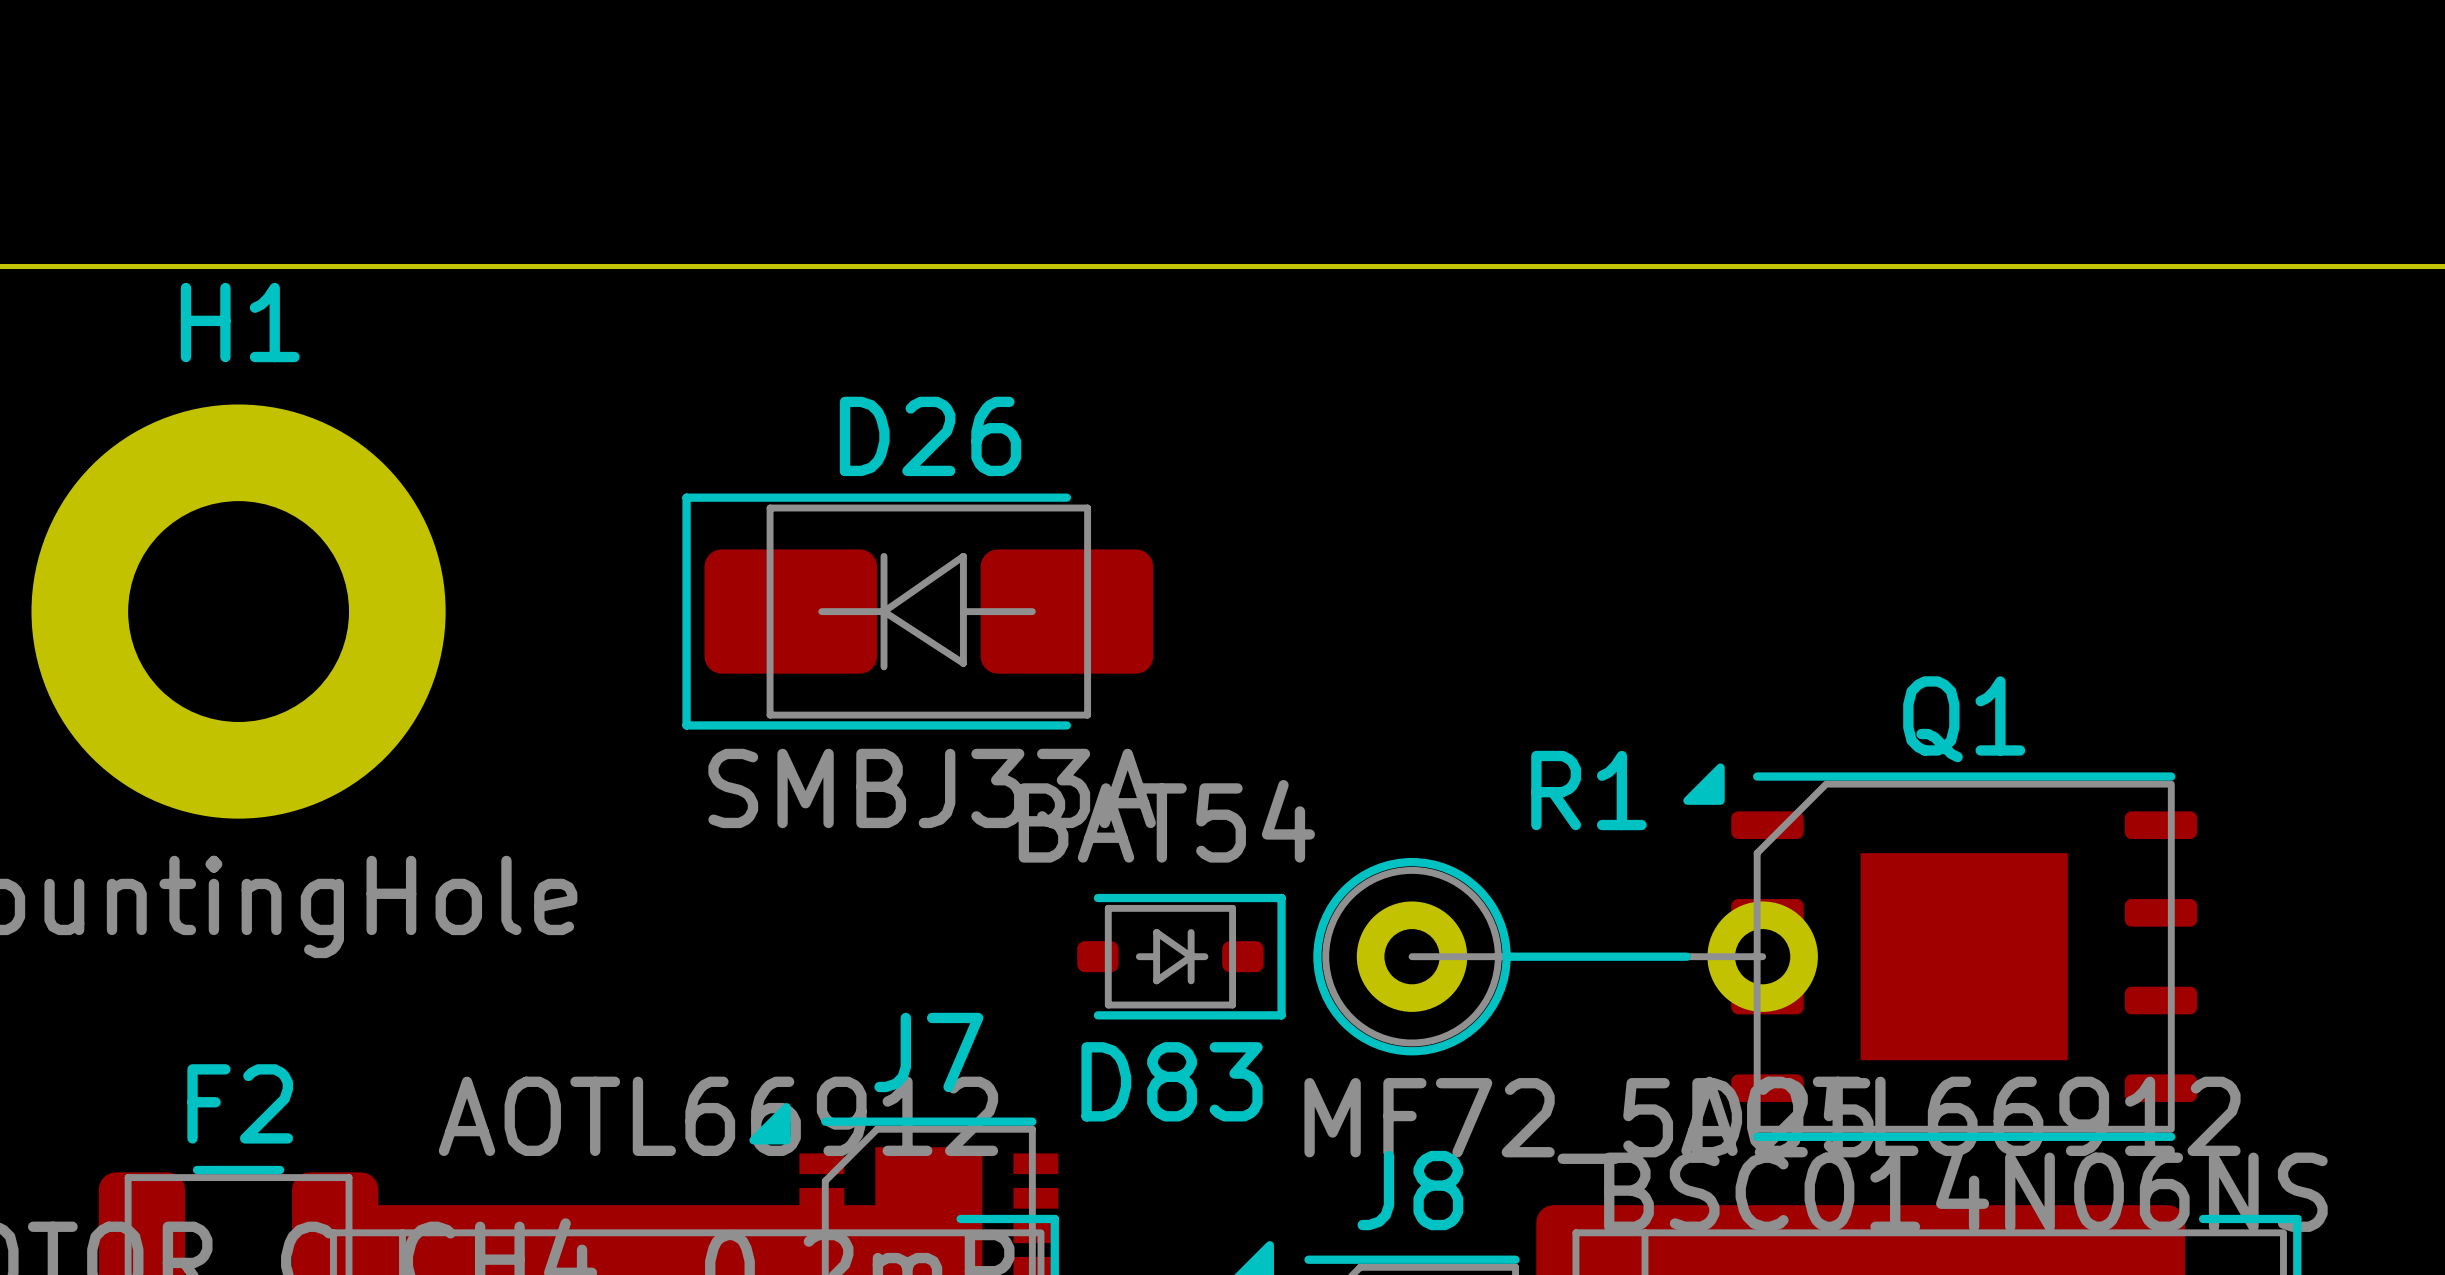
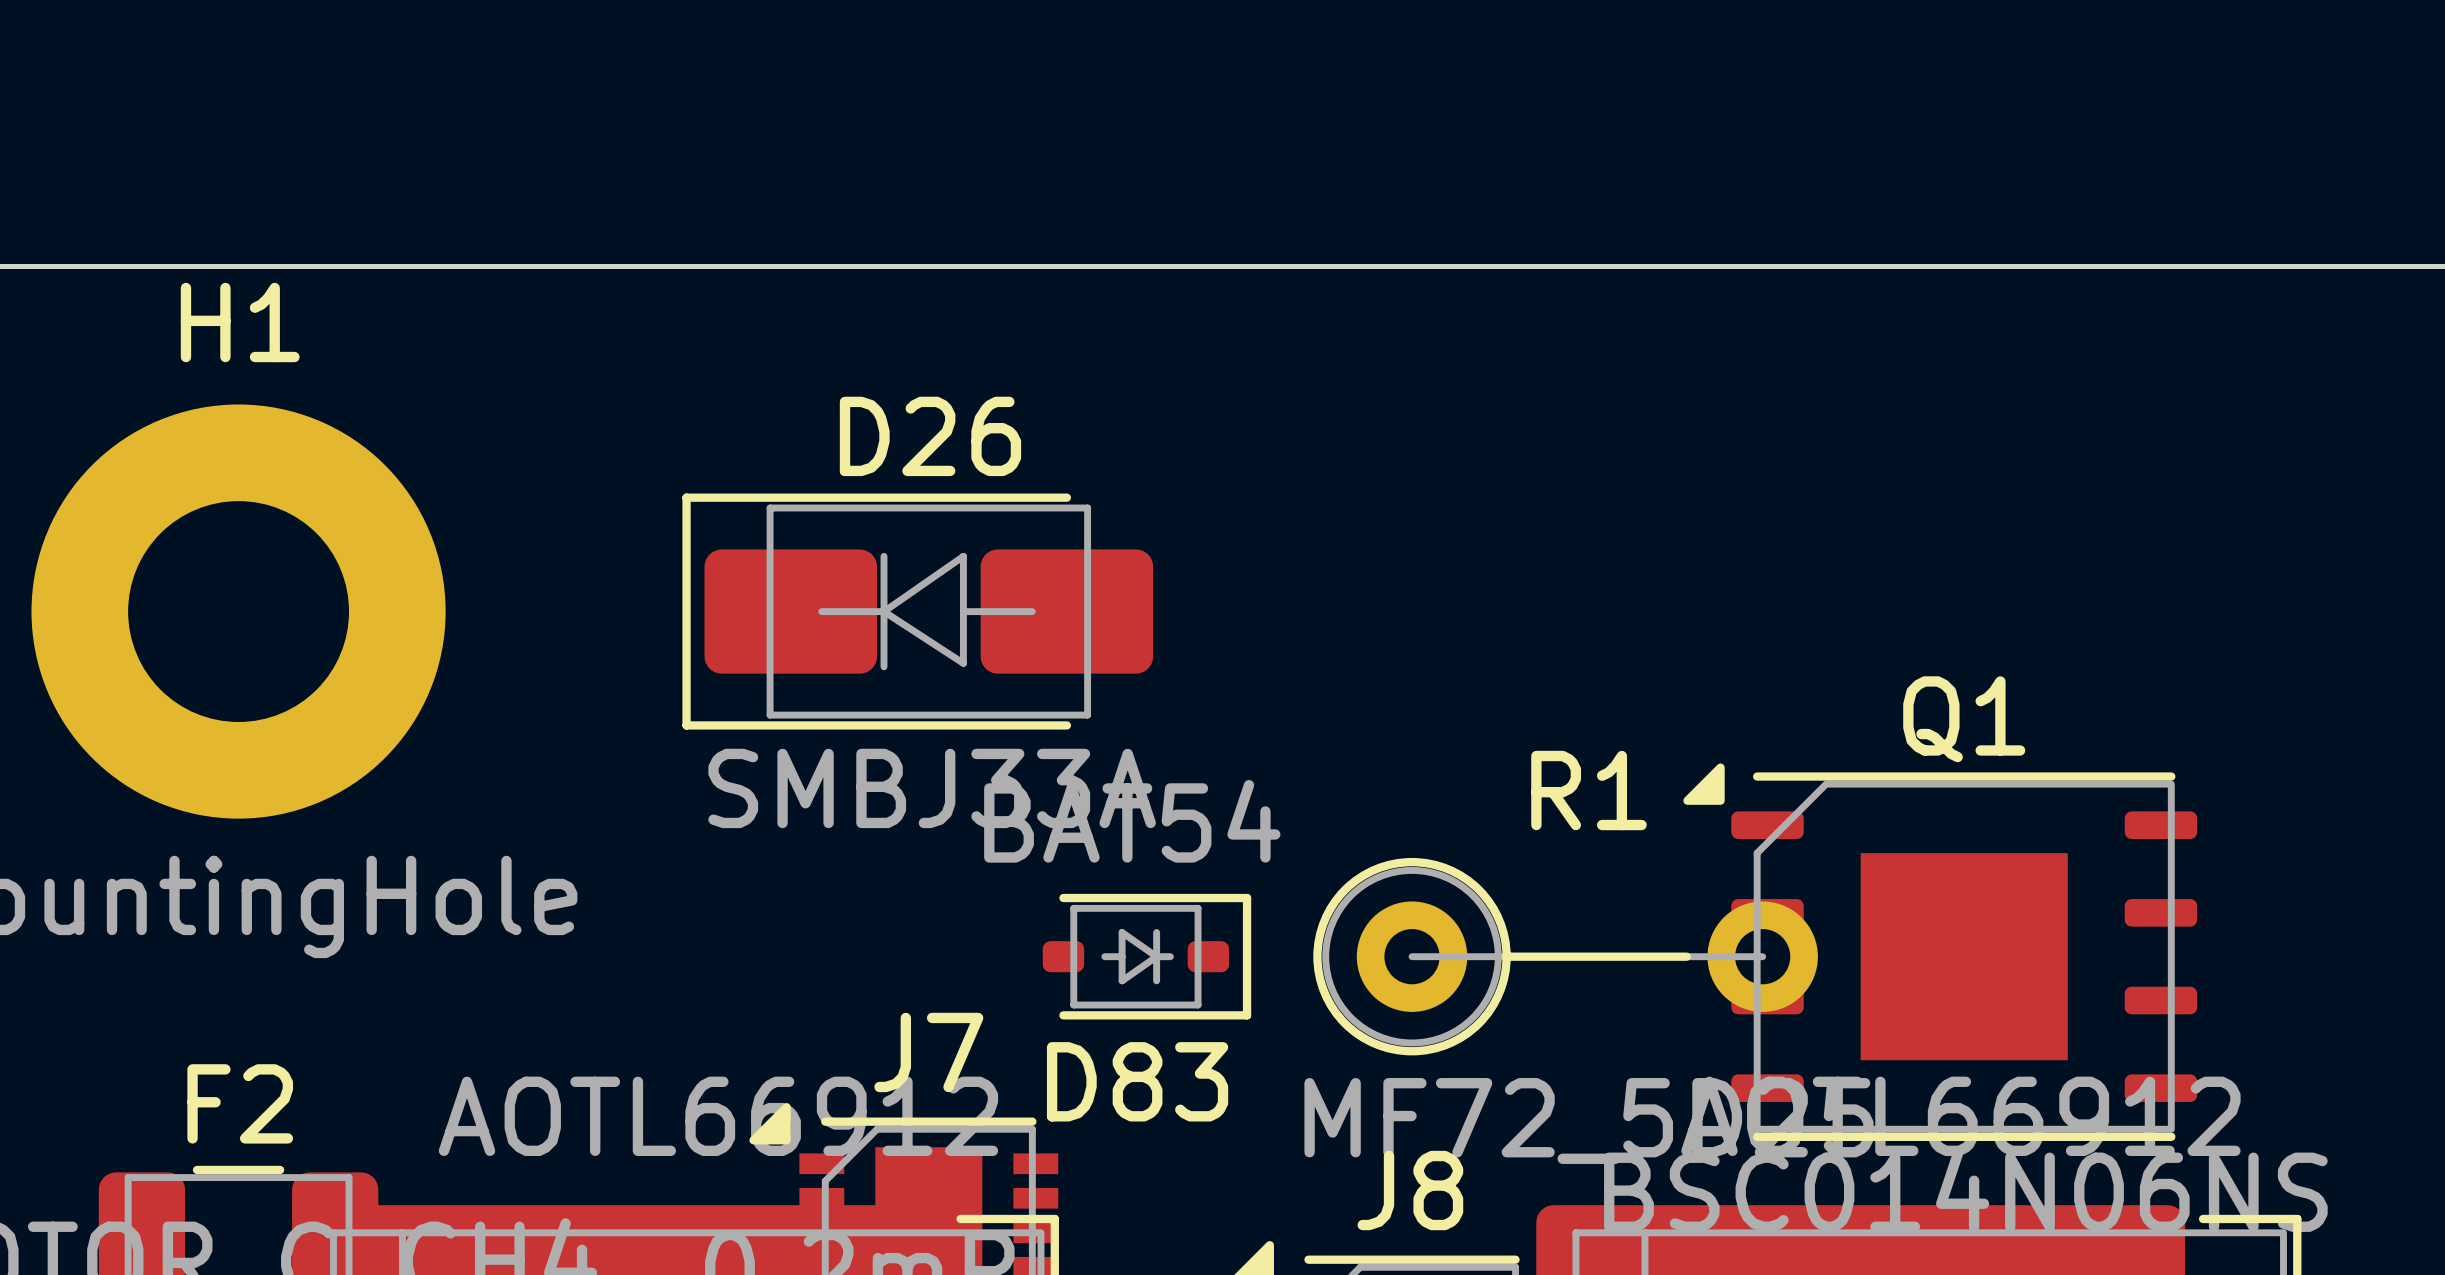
D83 position: (1181, 956) -> (1146, 956)

